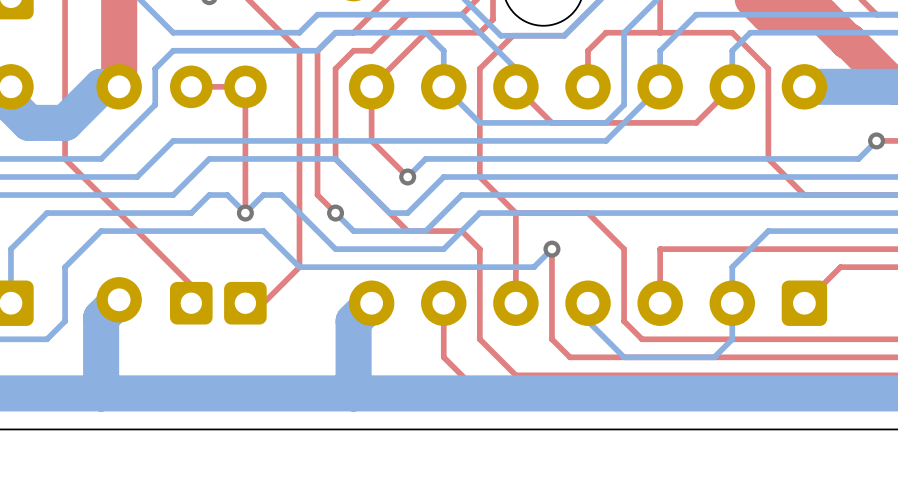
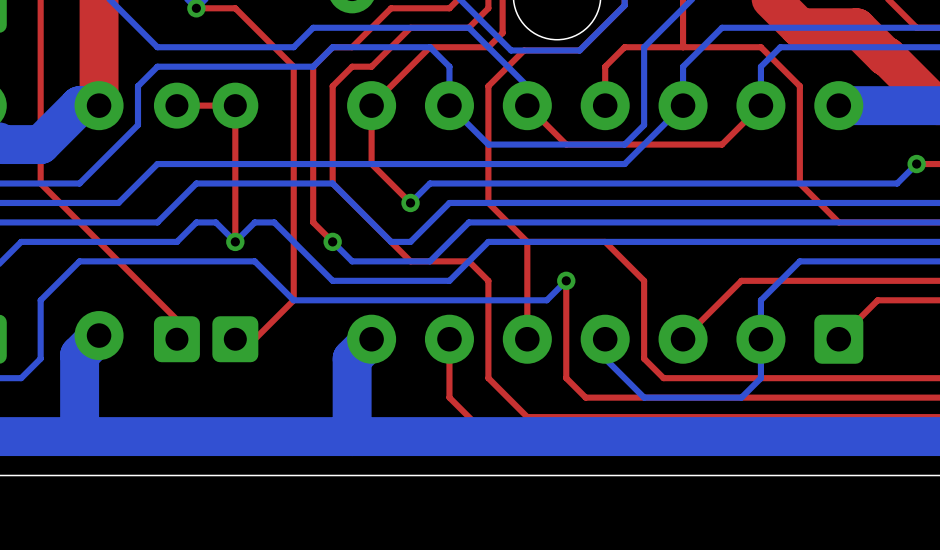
top track: (714, 249) (660, 249) (660, 303) -> (741, 280) (683, 339)

